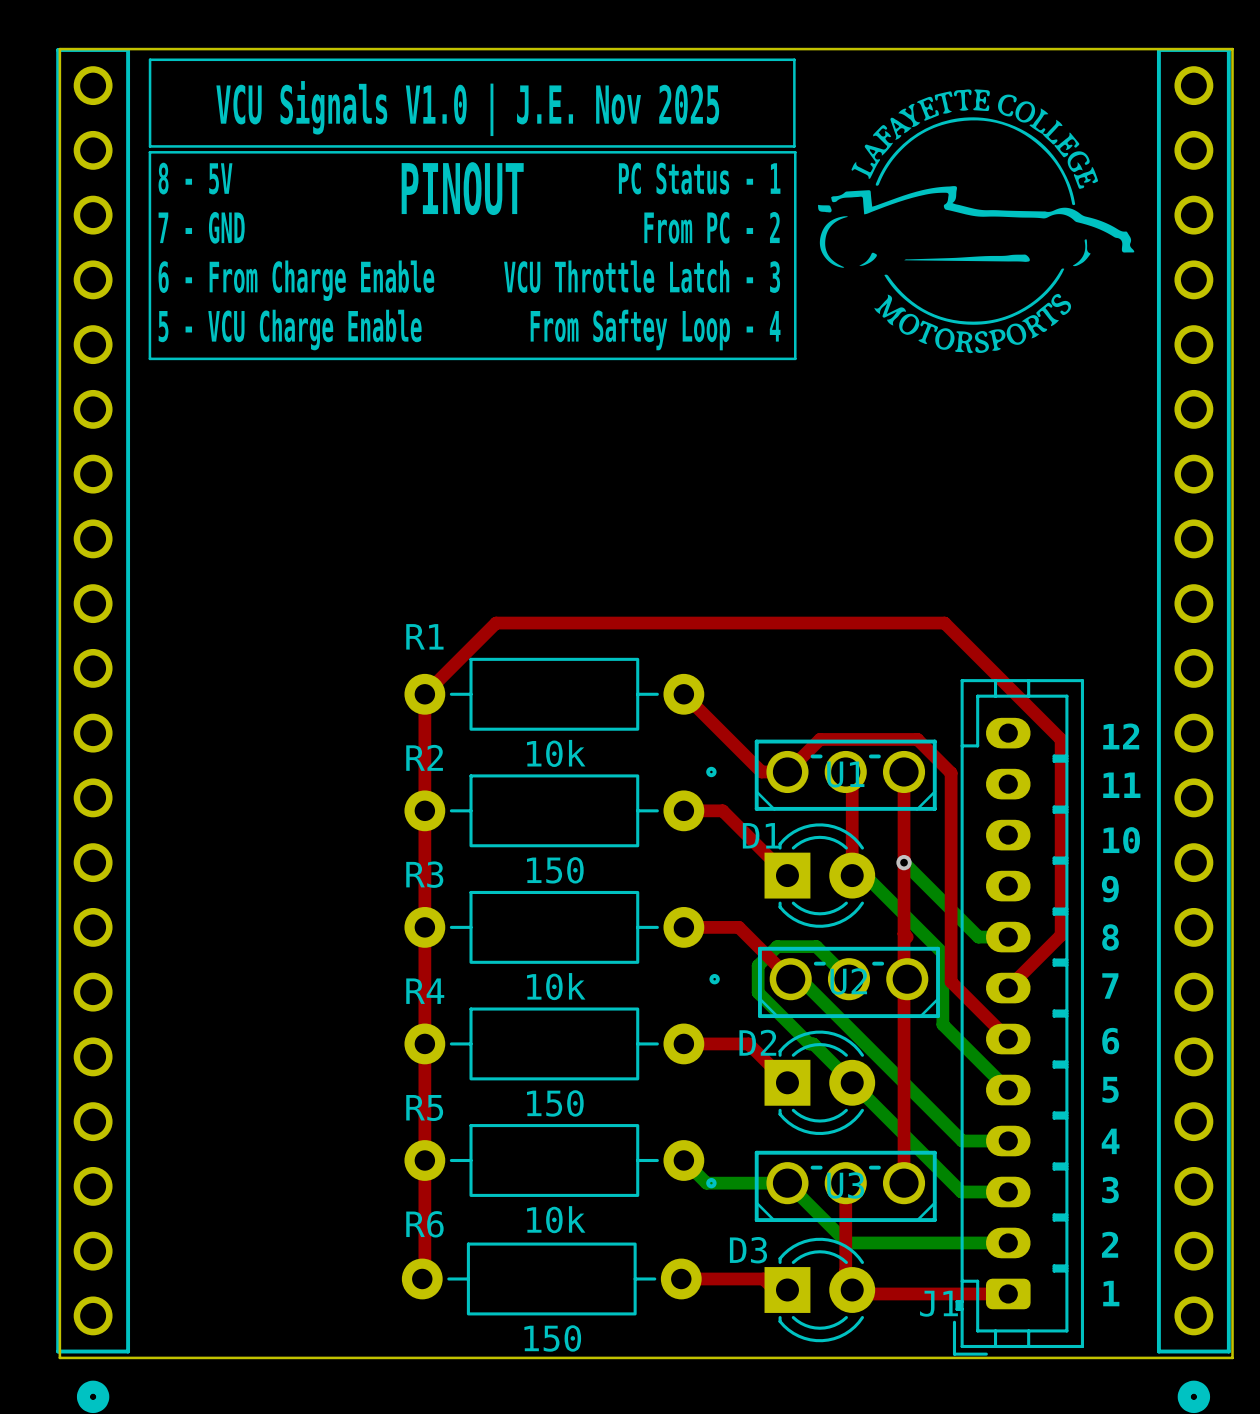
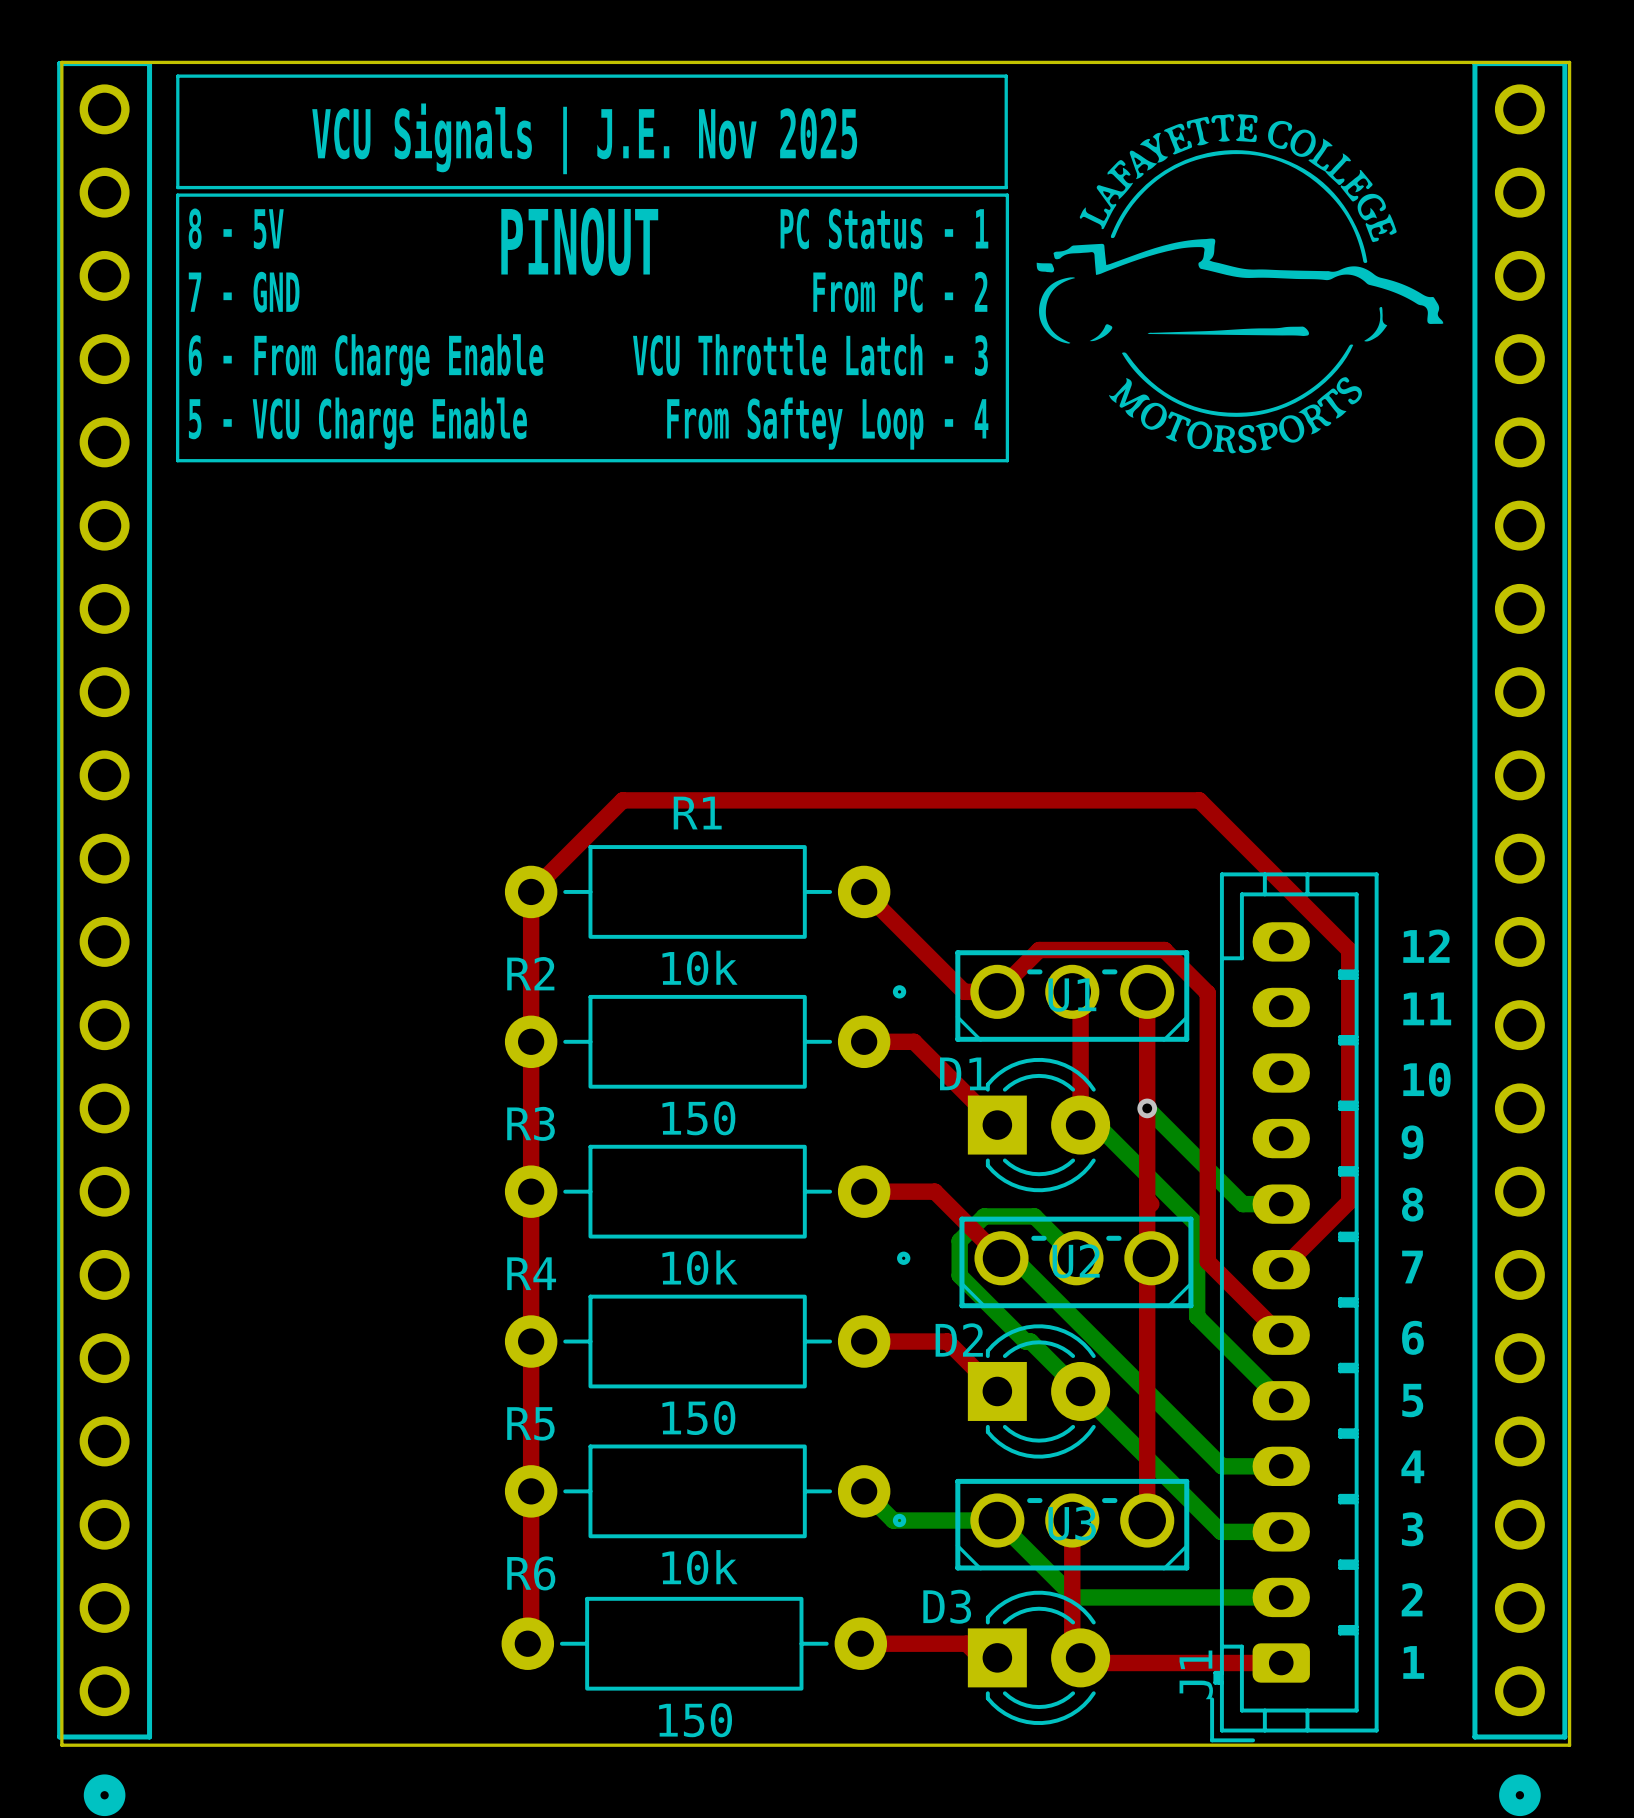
text: VCU Signals V1.0 | J.E. Nov 2025 (467, 108) -> VCU Signals | J.E. Nov 2025 (584, 138)
R1 name position: R1 (424, 636) -> R1 (697, 813)
J1 name rotation: 0° (938, 1303) -> 90° counterclockwise (1196, 1674)

